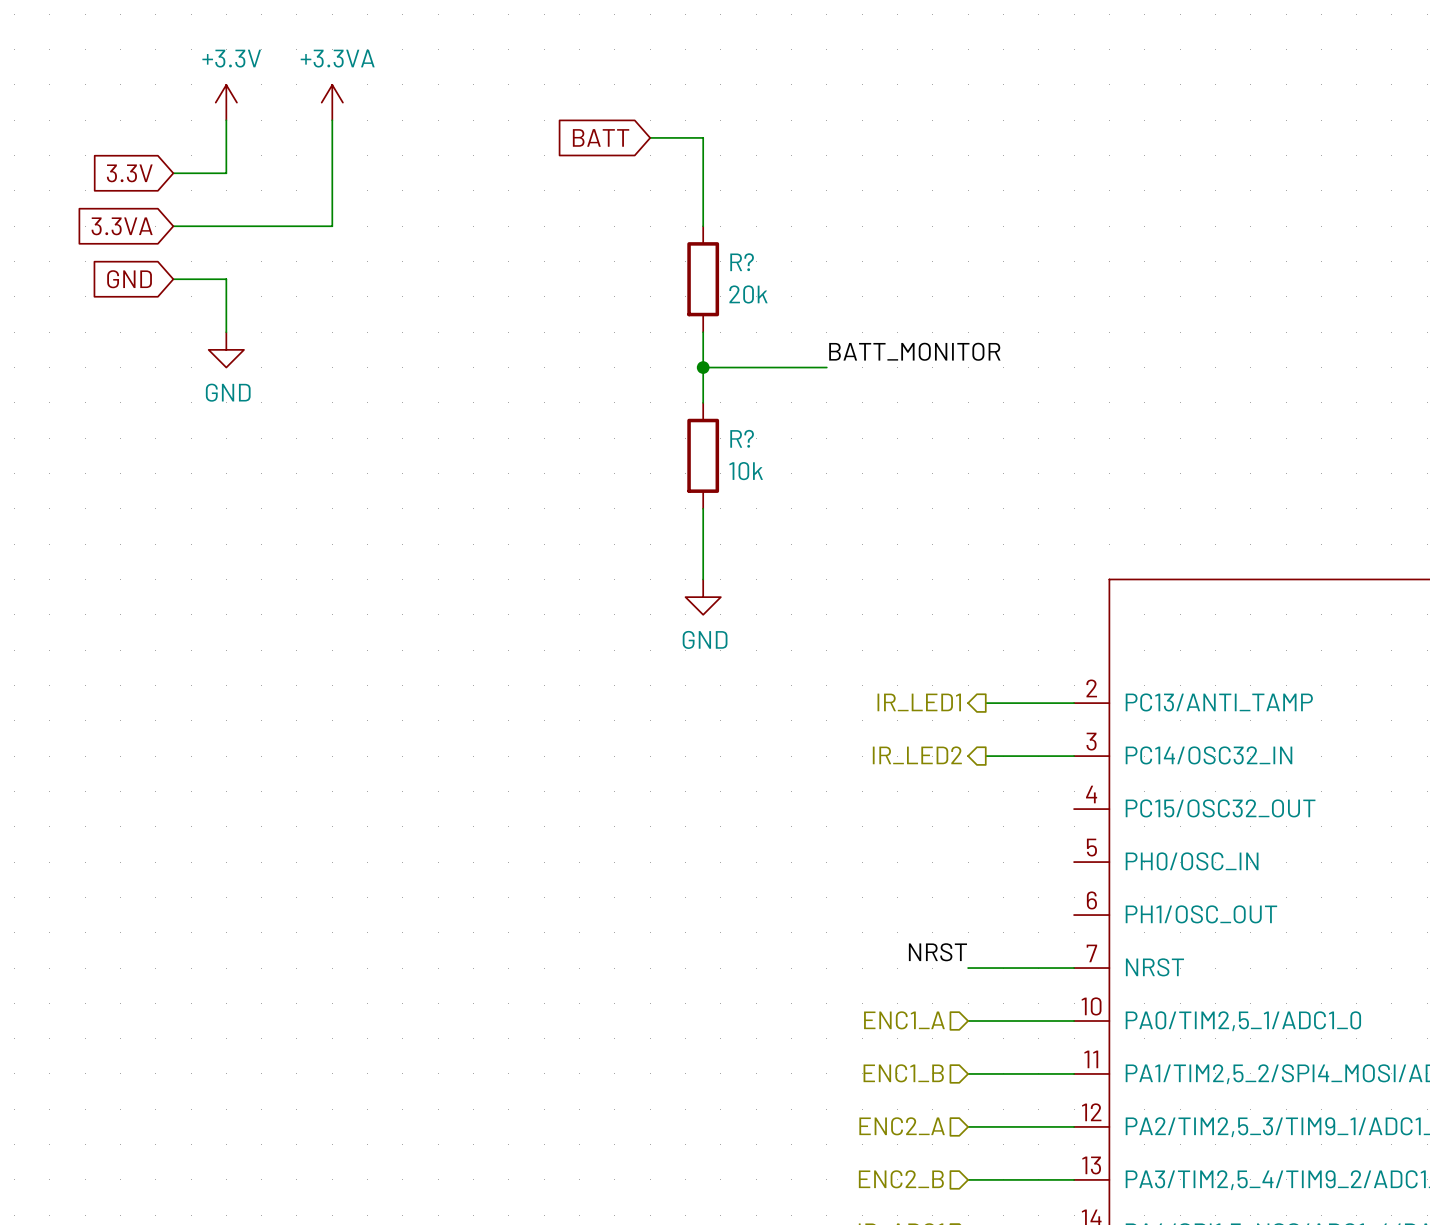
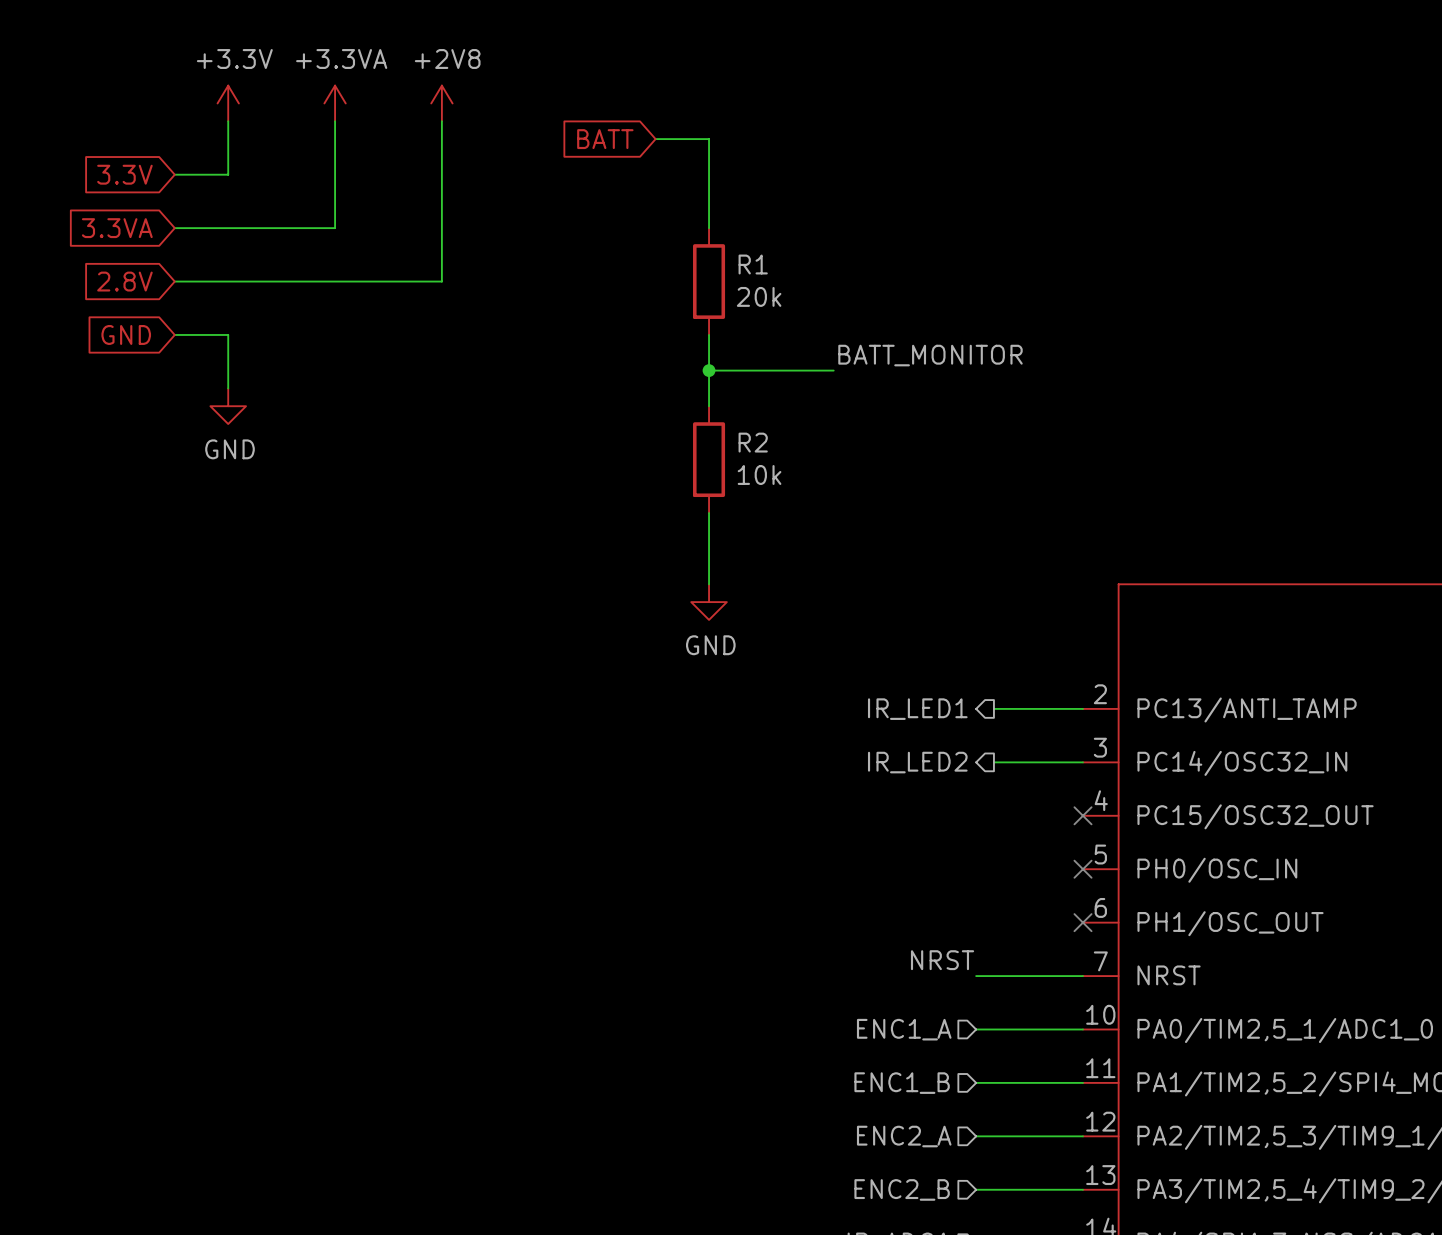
power symbol: none -> +2V8 (441, 103)
R? name: R? (742, 262) -> R1 (753, 264)
global label: GND (129, 279) -> 2.8V (124, 281)
wire: (226, 279) (226, 332) -> (228, 281) (441, 281) (441, 121)
global label: none -> GND (126, 334)
wire: none -> (174, 334) (228, 334) (228, 388)
power symbol position: GND (226, 349) -> GND (228, 406)
R? name: R? (742, 438) -> R2 (753, 442)
no-connect mark: none -> (1083, 815)
no-connect mark: none -> (1083, 869)
no-connect mark: none -> (1083, 922)

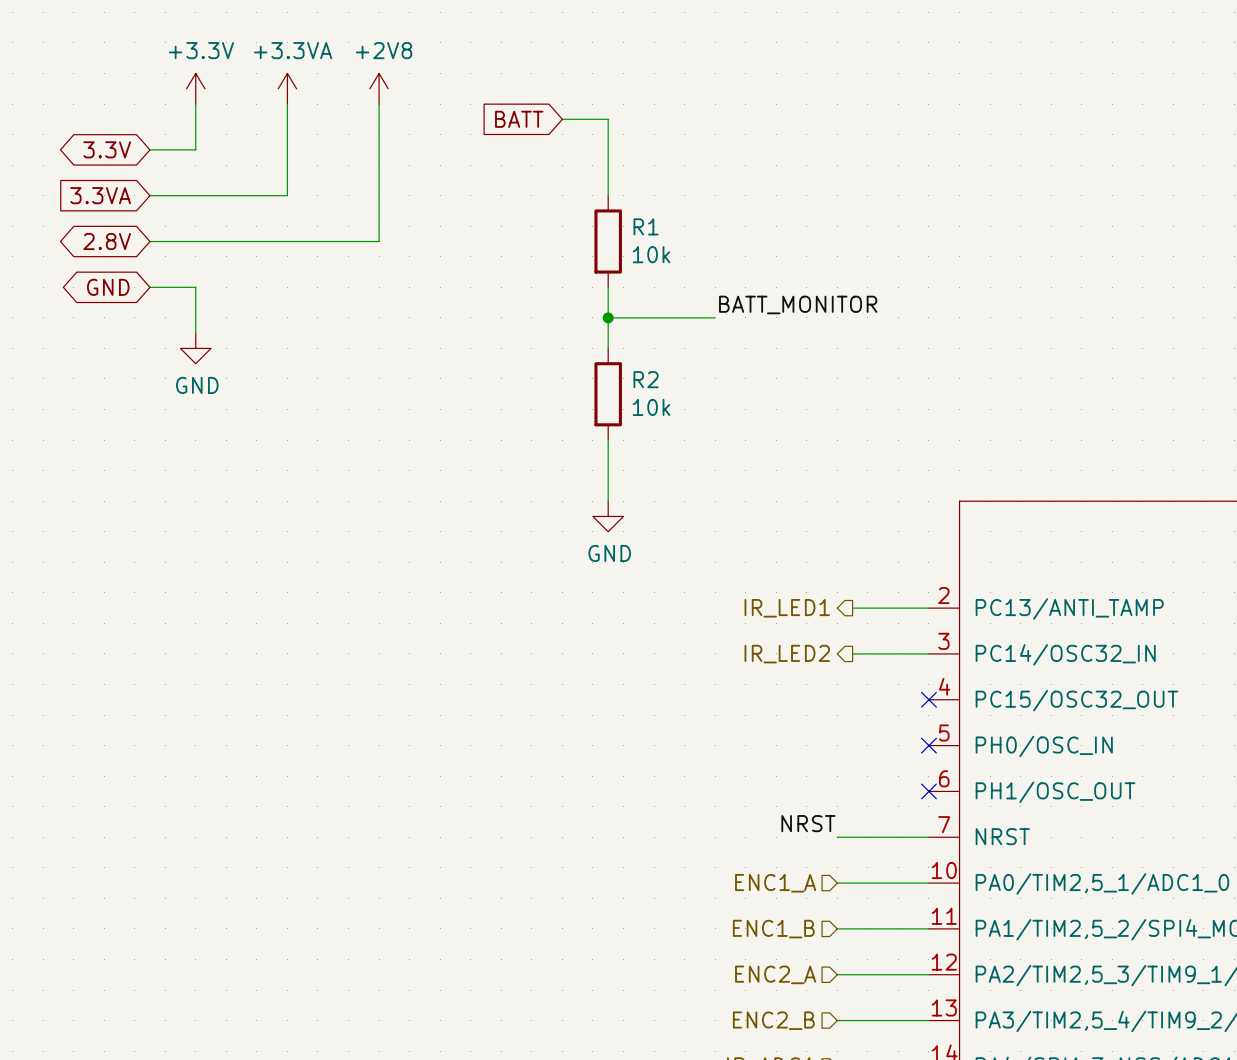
global label shape: input (124, 174) -> bidirectional (107, 149)
global label shape: input (124, 281) -> bidirectional (107, 241)
R1 value: 20k (759, 296) -> 10k (651, 254)
global label shape: input (126, 334) -> bidirectional (108, 287)

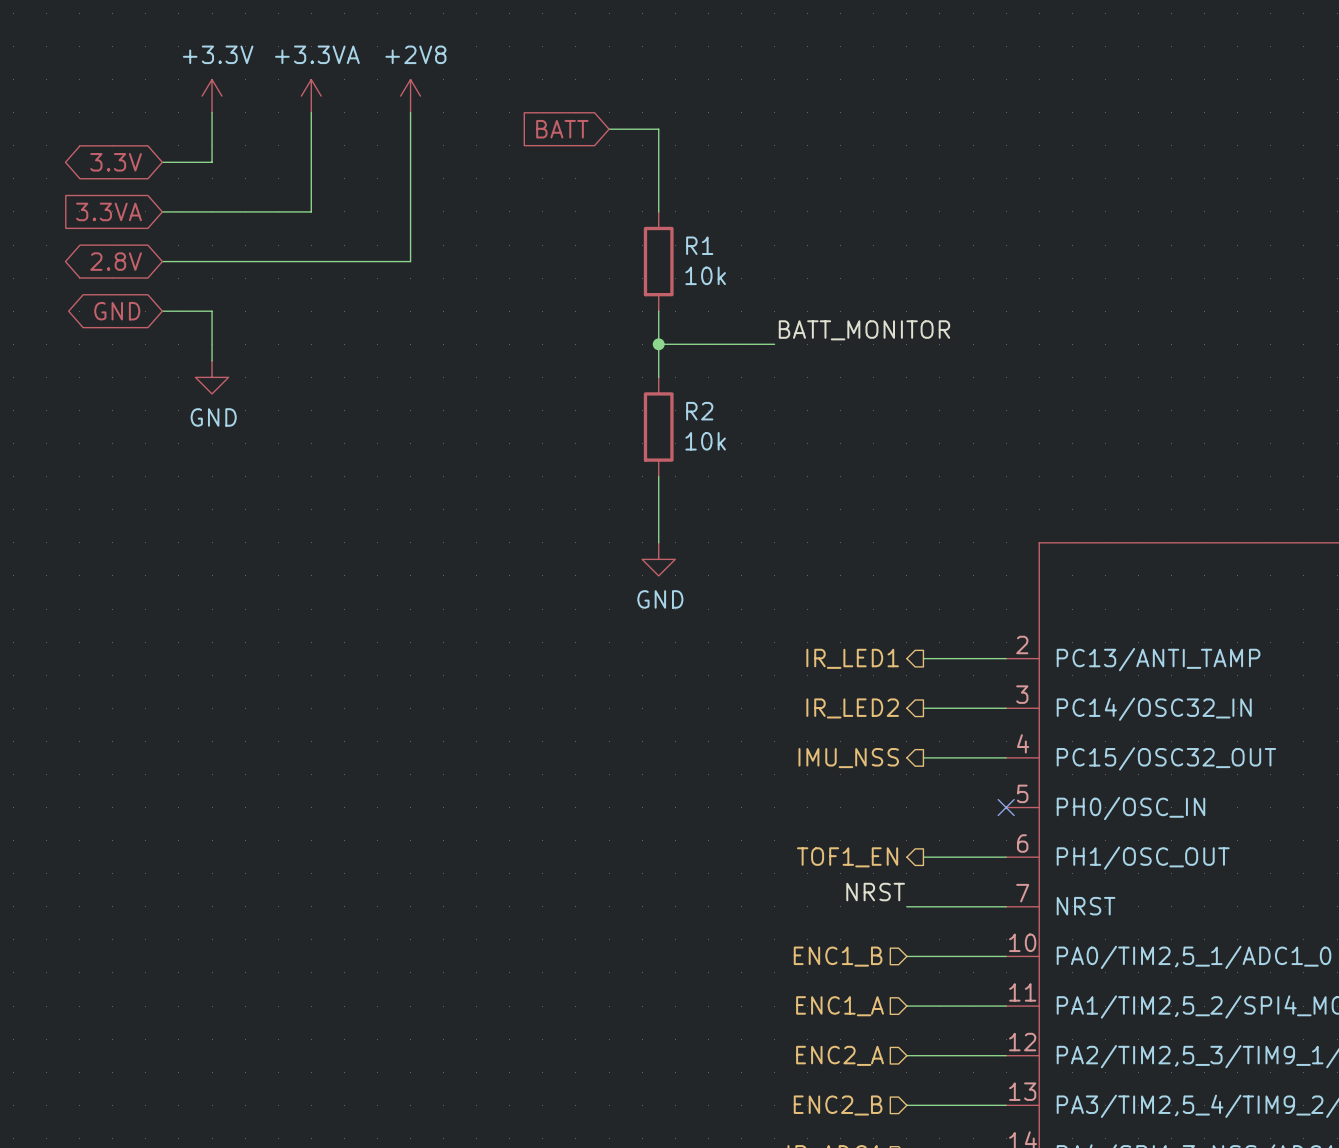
hierarchical label: none -> IMU_NSS (848, 758)
wire: none -> (923, 757) (1006, 757)
no-connect mark: (928, 699) -> none
hierarchical label: none -> TOF1_EN (847, 857)
wire: none -> (923, 857) (1006, 857)
no-connect mark: (928, 791) -> none
hierarchical label: ENC1_A (775, 883) -> ENC1_B (838, 956)
hierarchical label: ENC1_B (773, 929) -> ENC1_A (840, 1006)

